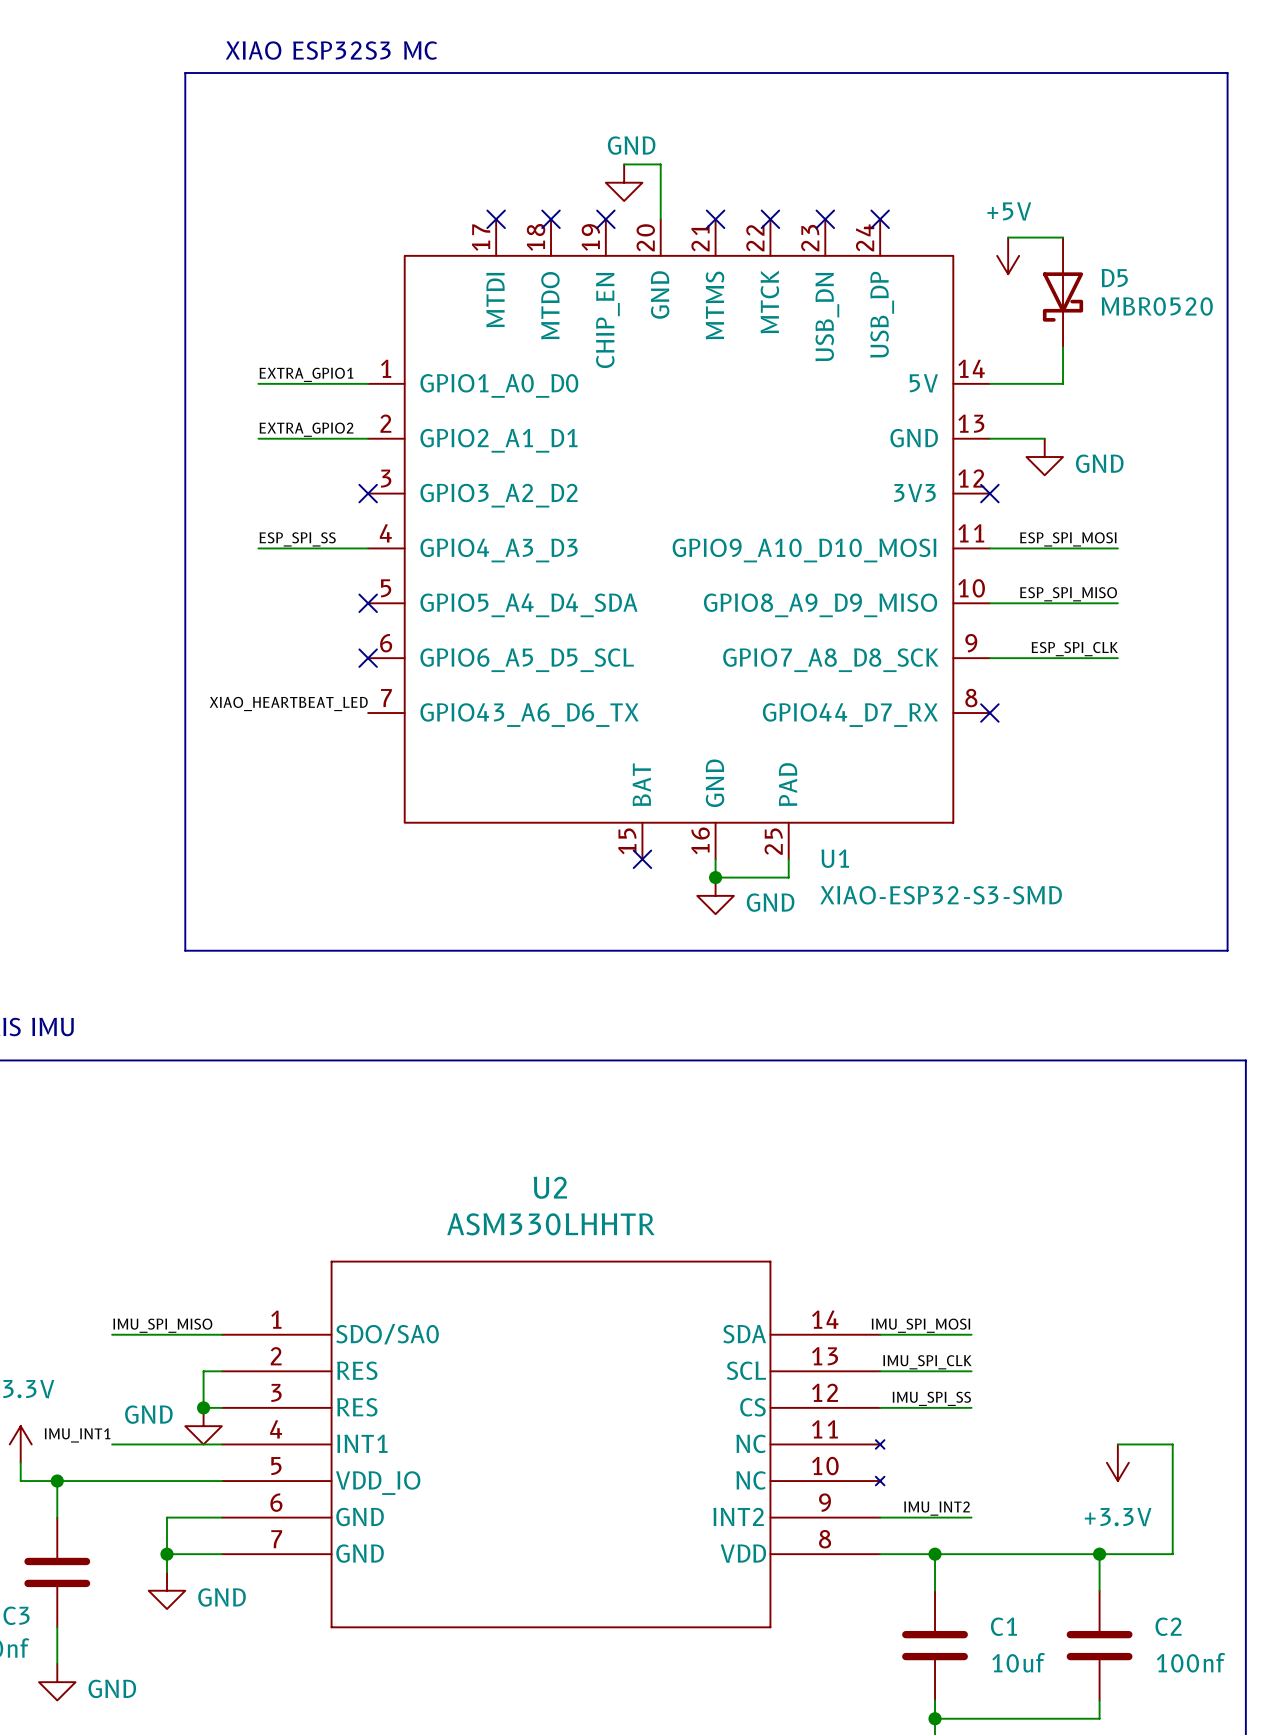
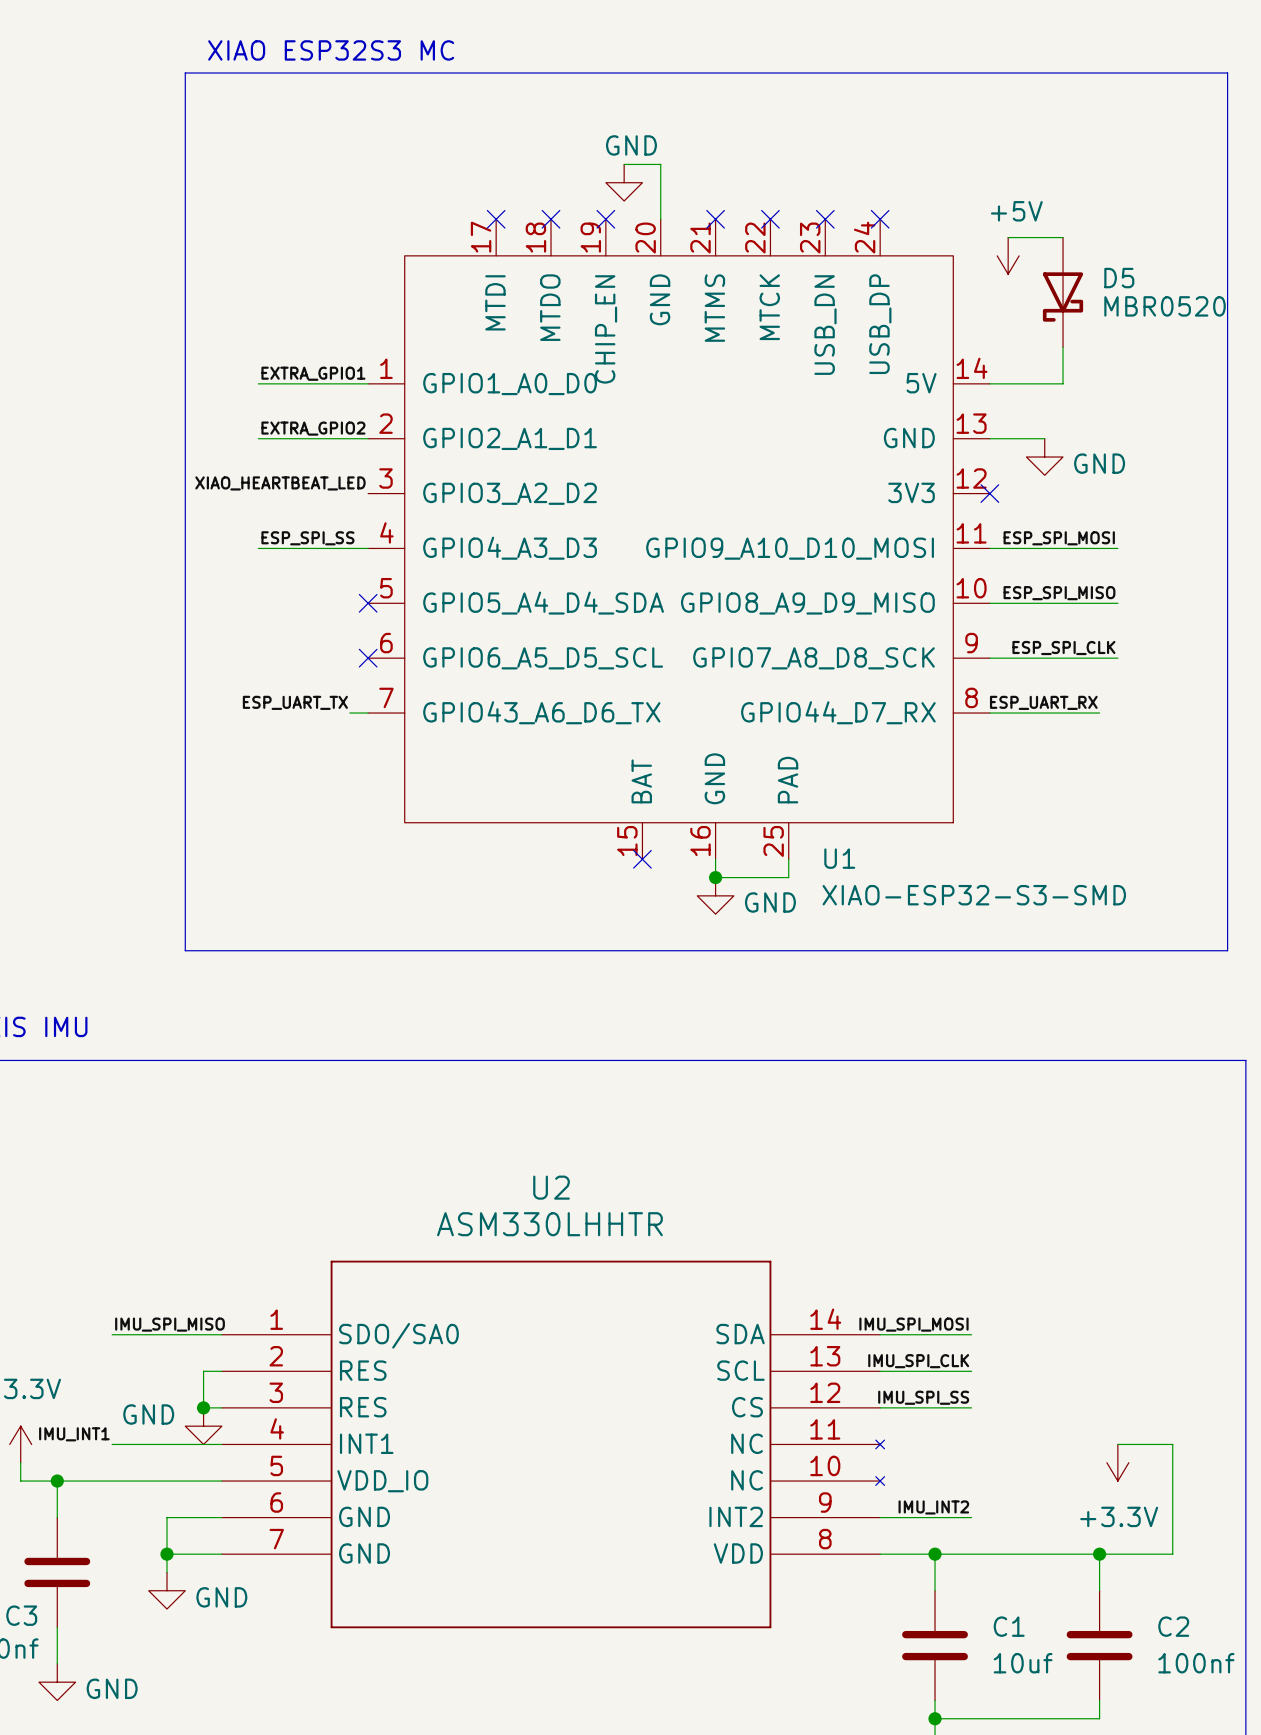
no-connect mark: (368, 493) -> none
label position: XIAO_HEARTBEAT_LED (288, 703) -> XIAO_HEARTBEAT_LED (280, 483)
label: none -> ESP_UART_TX (295, 702)
label: none -> ESP_UART_RX (1043, 702)
wire: none -> (349, 713) (368, 713)
wire: none -> (989, 713) (1099, 713)
no-connect mark: (989, 713) -> none

